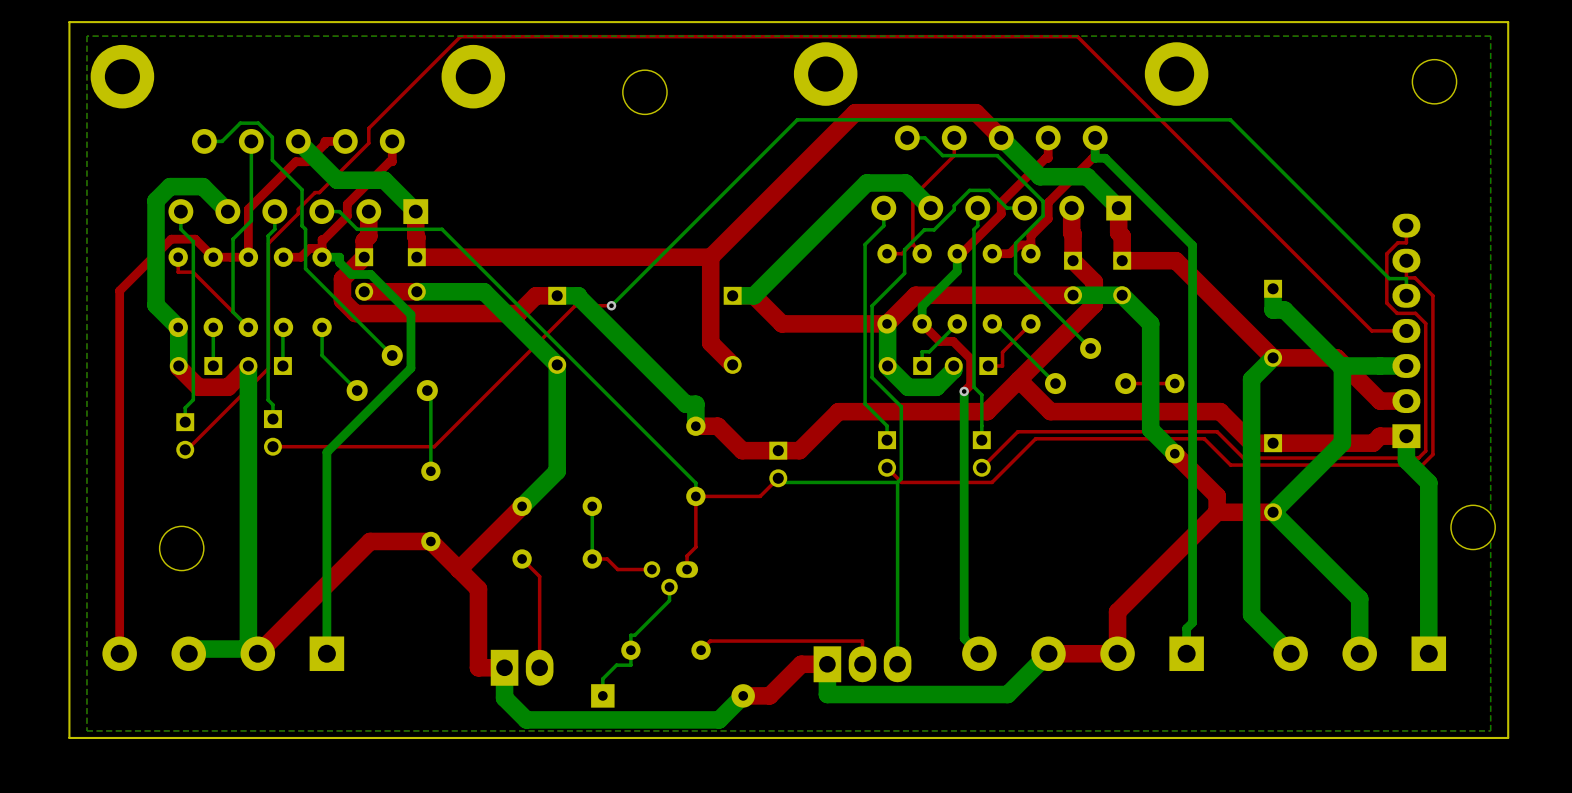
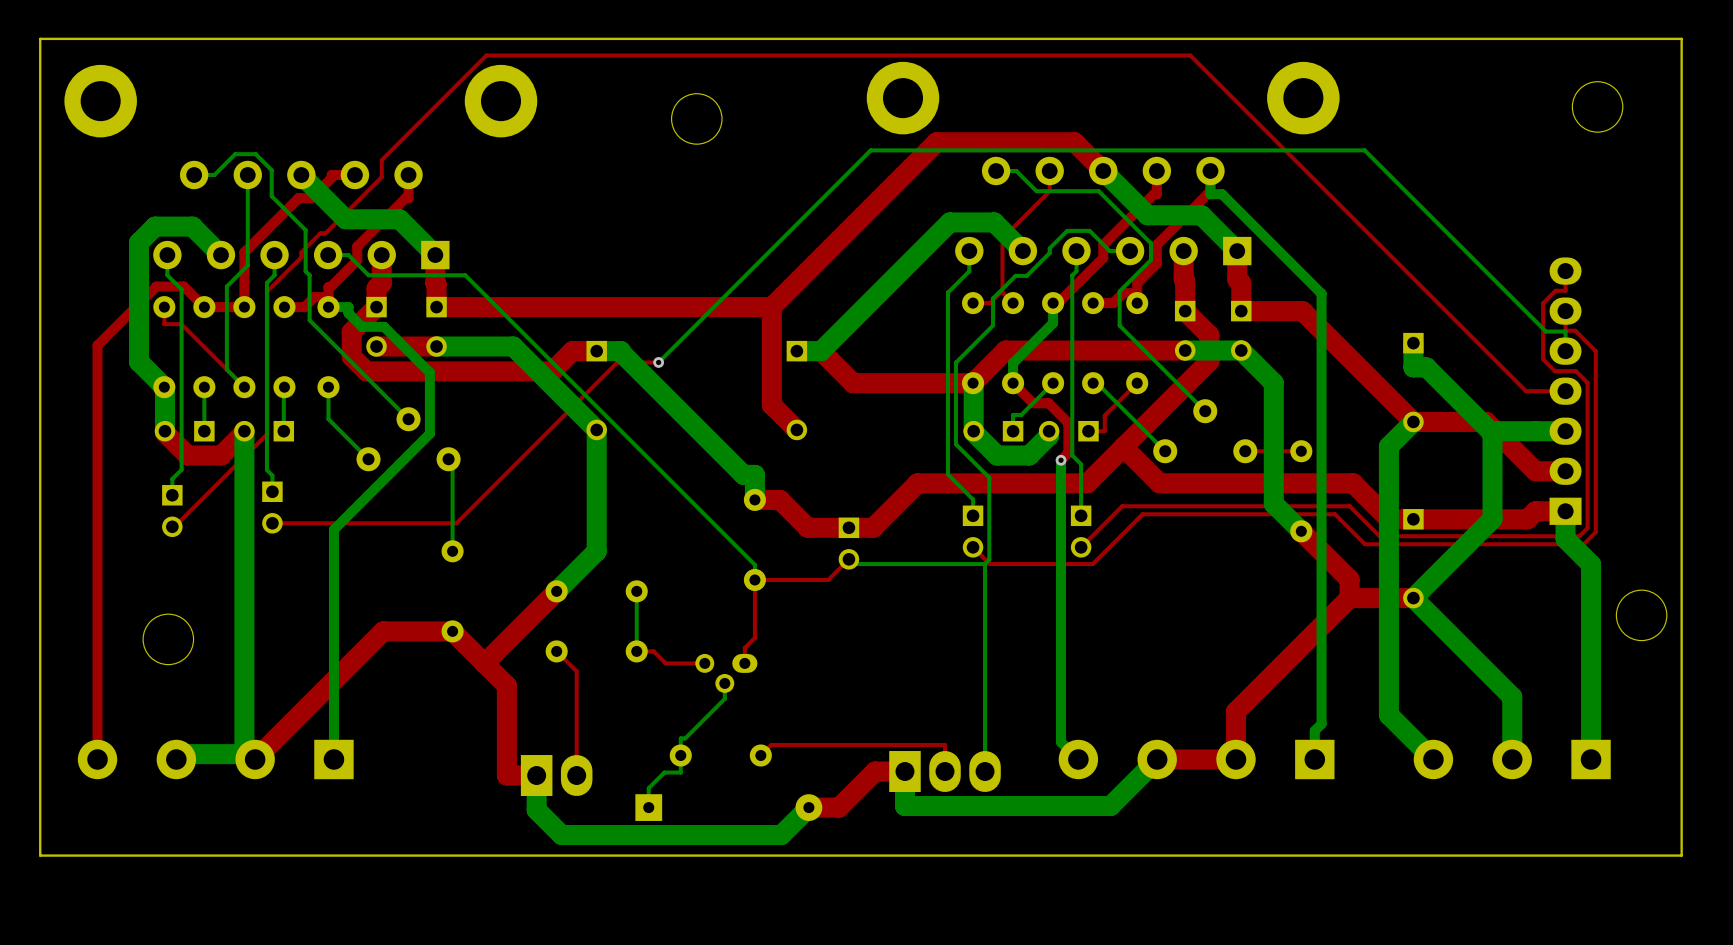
bottom zone outline: (1490, 36) (1490, 730) (86, 730) (86, 36) (1490, 36) -> none

